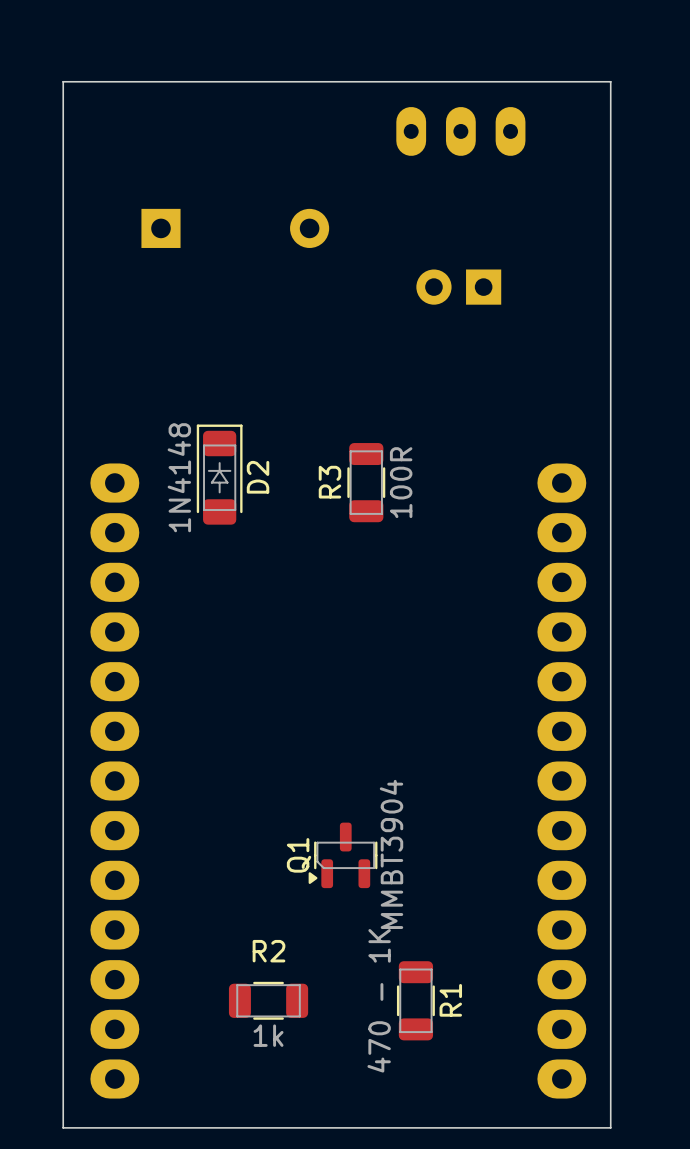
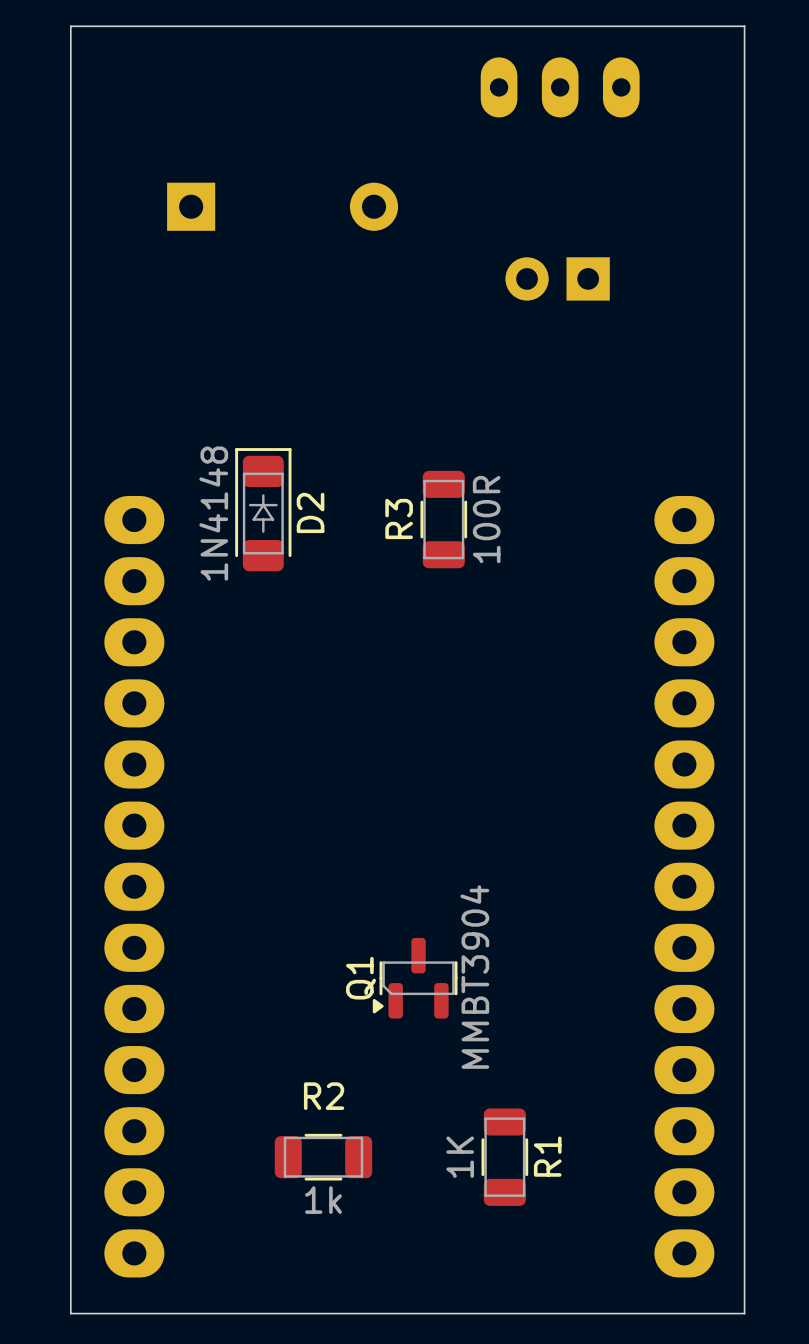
R1 value: 470 - 1K (379, 1000) -> 1K (460, 1157)

